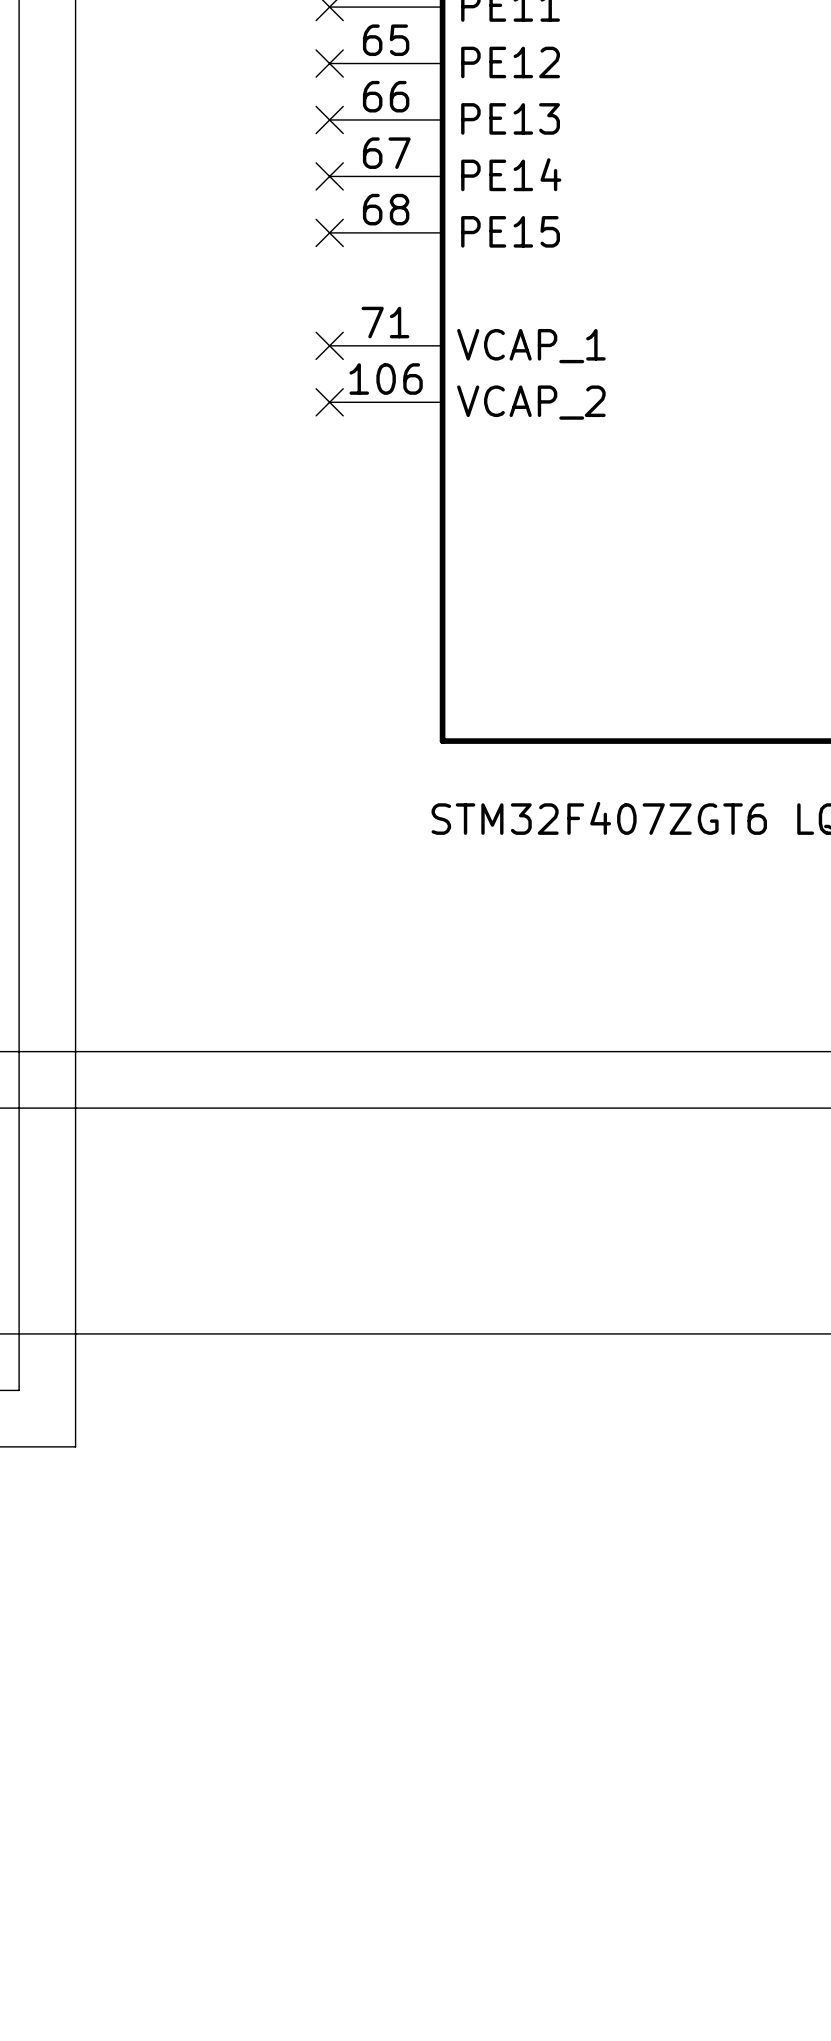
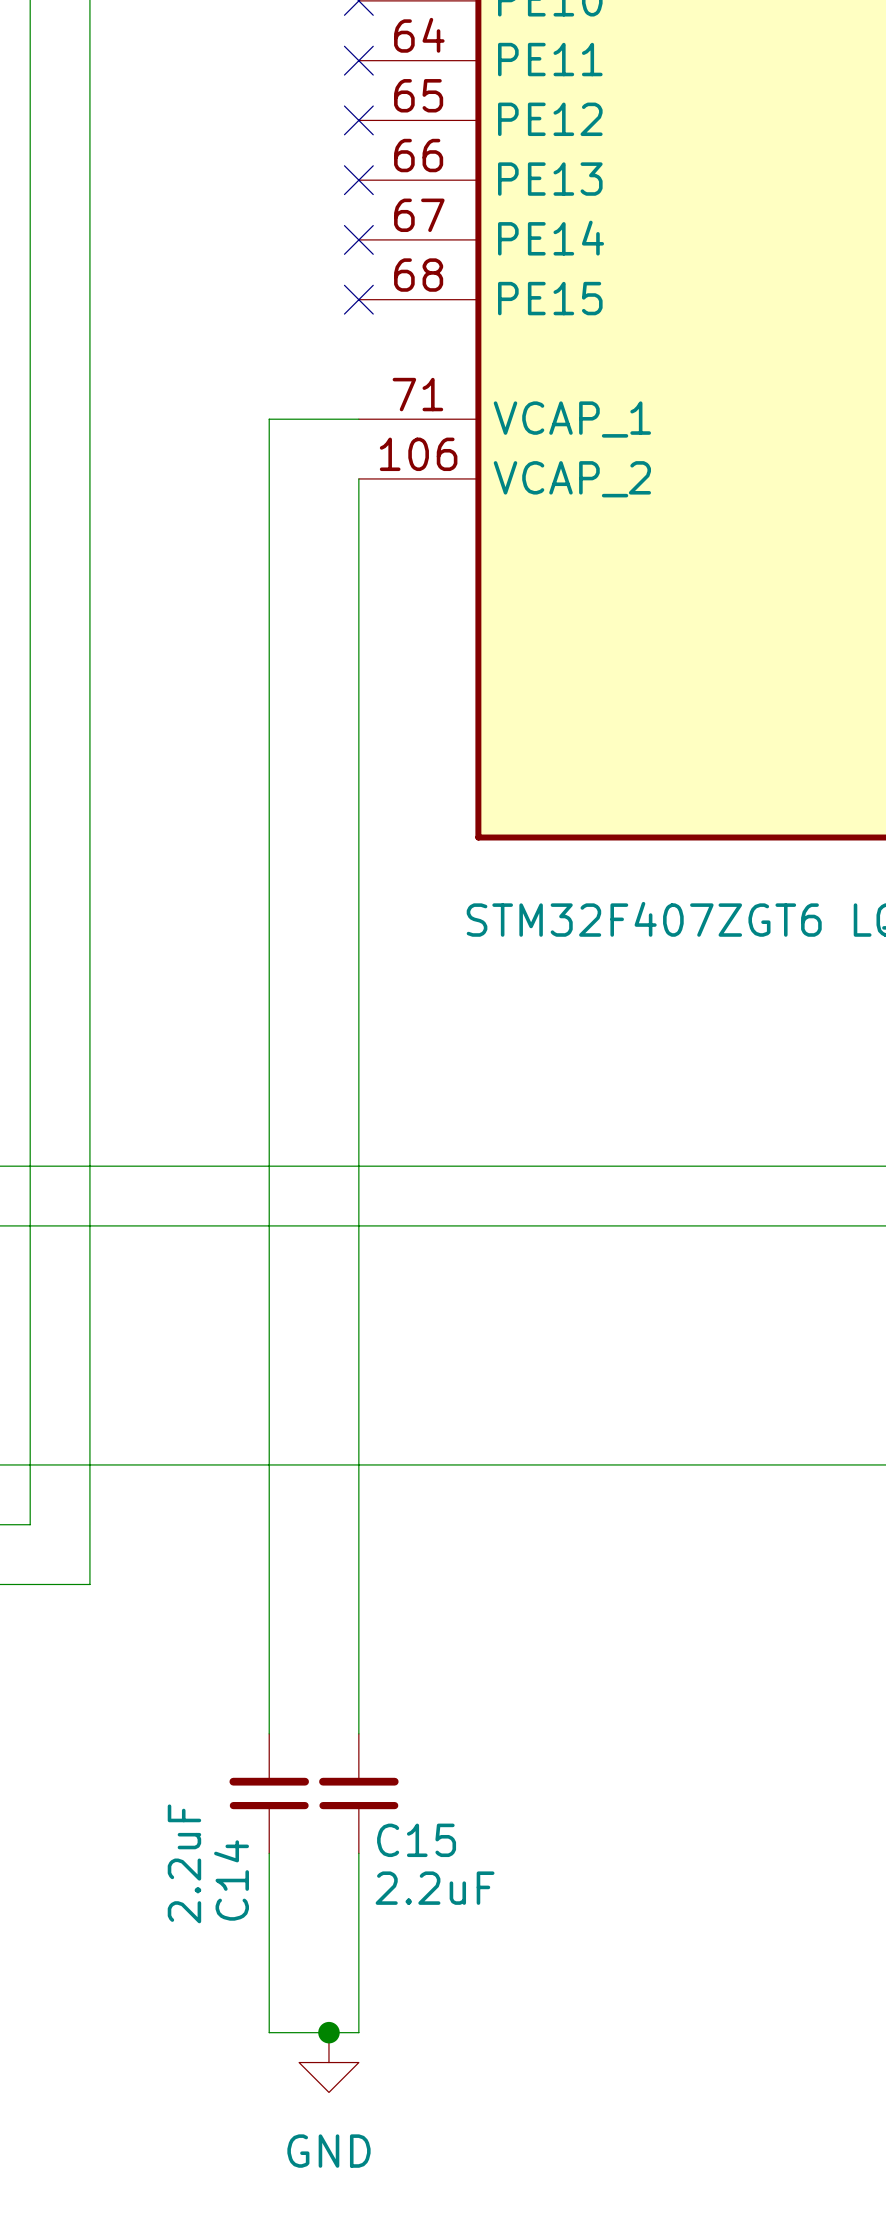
wire: none -> (358, 419) (269, 419) (269, 1733)
no-connect mark: (329, 345) -> none
wire: none -> (358, 478) (358, 1733)
no-connect mark: (329, 402) -> none
C14: none -> 2.2uF (269, 1793)
C15: none -> 2.2uF (358, 1793)
wire: none -> (269, 1853) (269, 2032) (358, 2032) (358, 1853)
junction: none -> (328, 2032)
power symbol: none -> GND (328, 2062)

